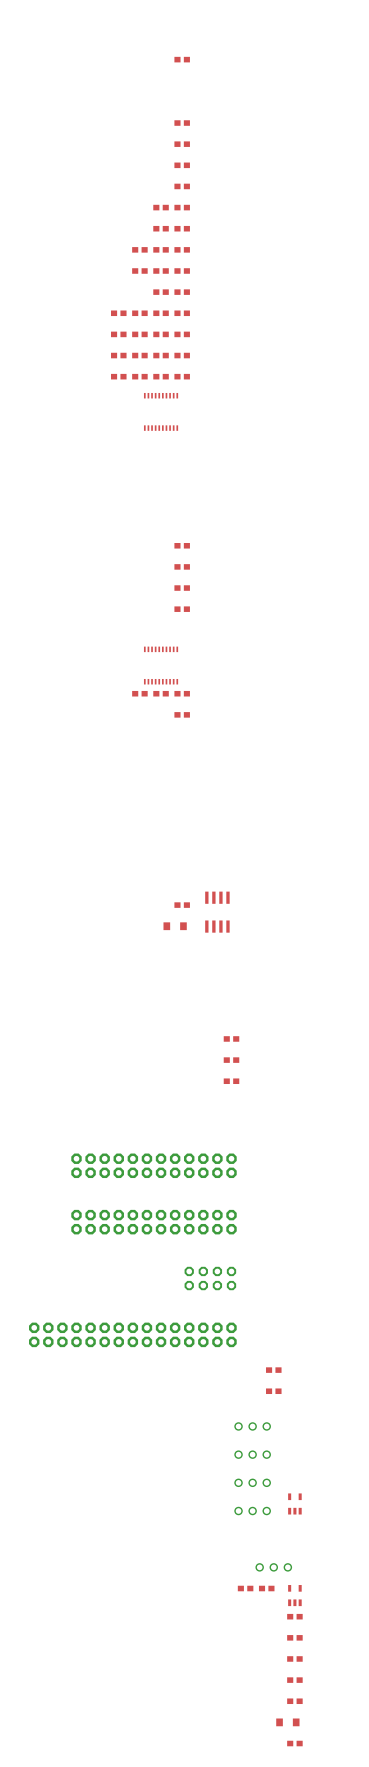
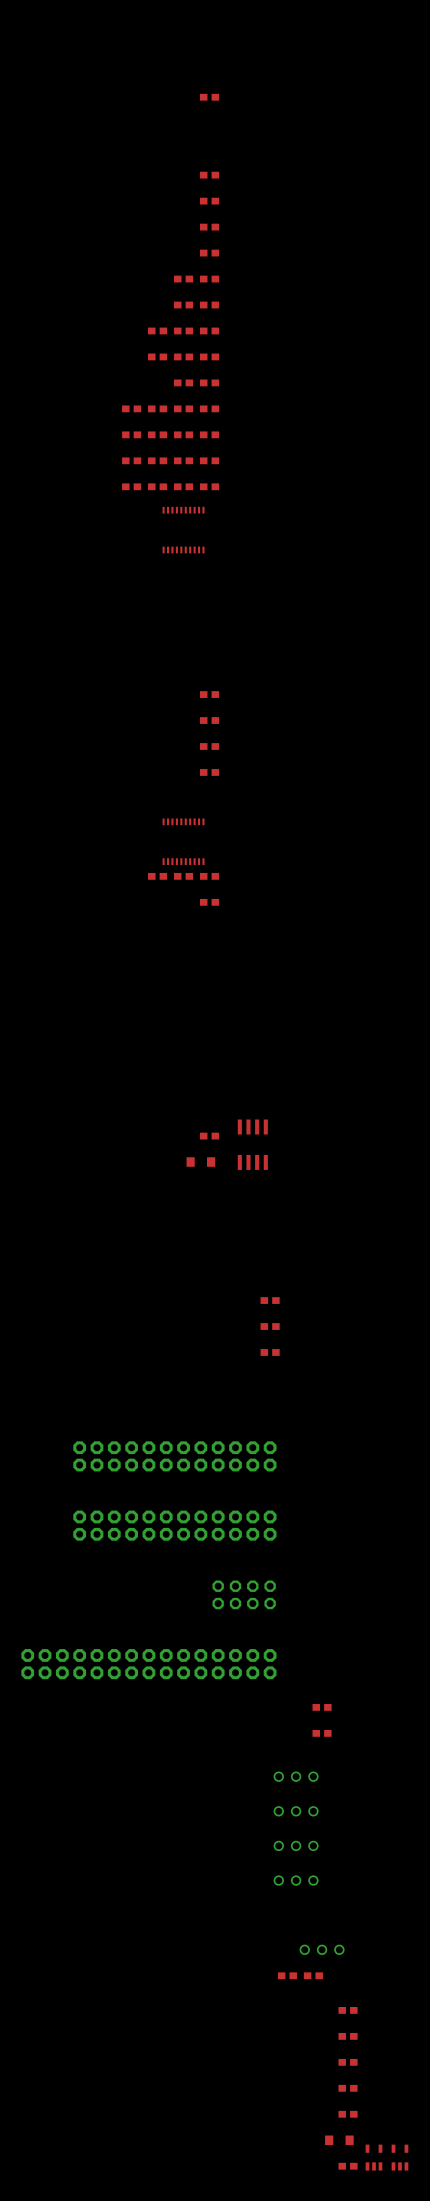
part: (294, 1503) -> none
part: (294, 1595) -> none
part: none -> (374, 2157)
part: none -> (399, 2157)

